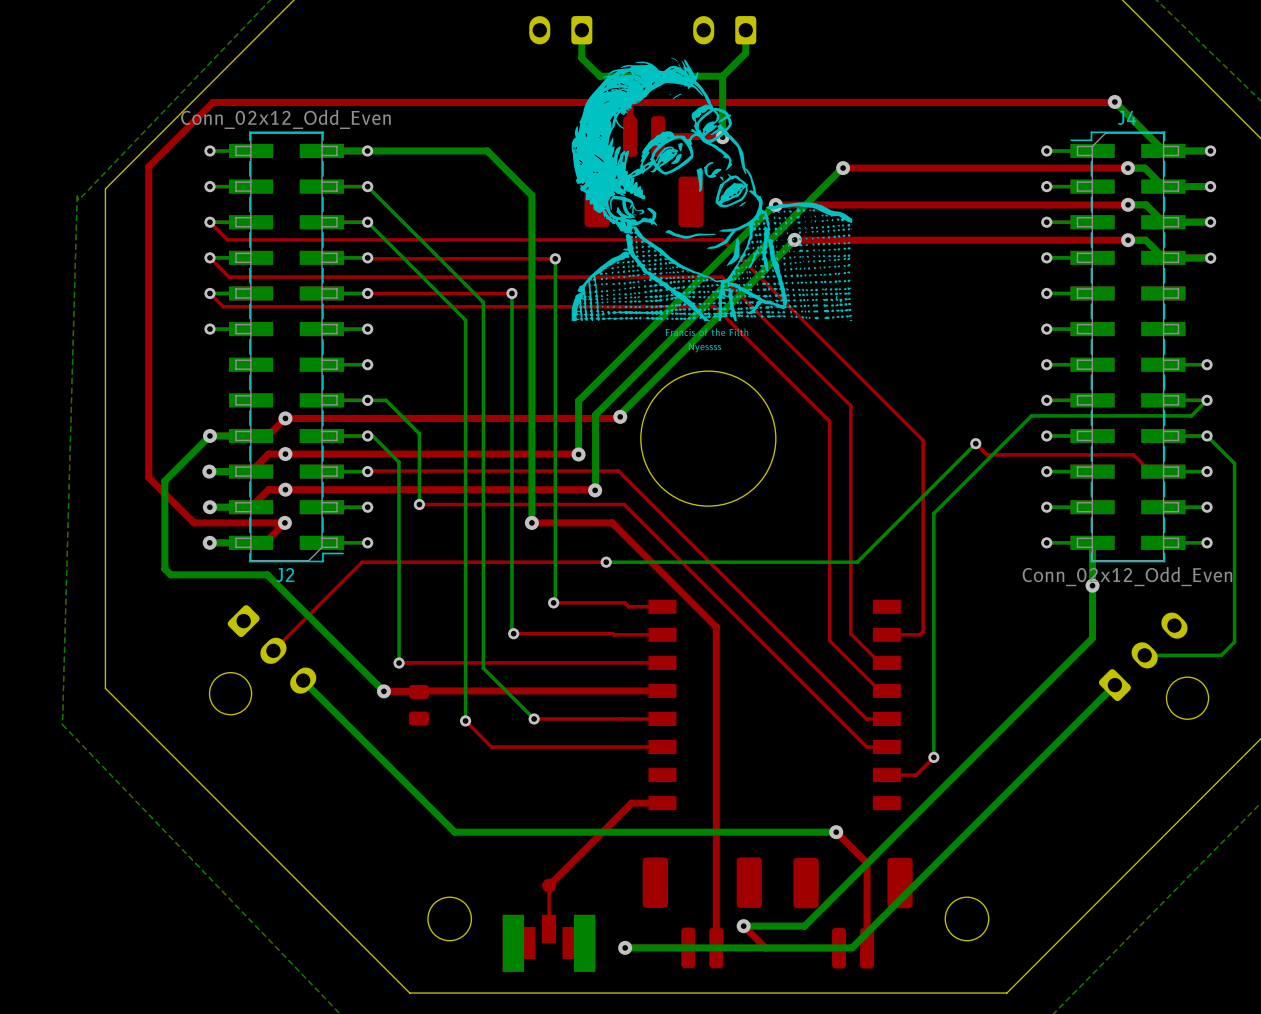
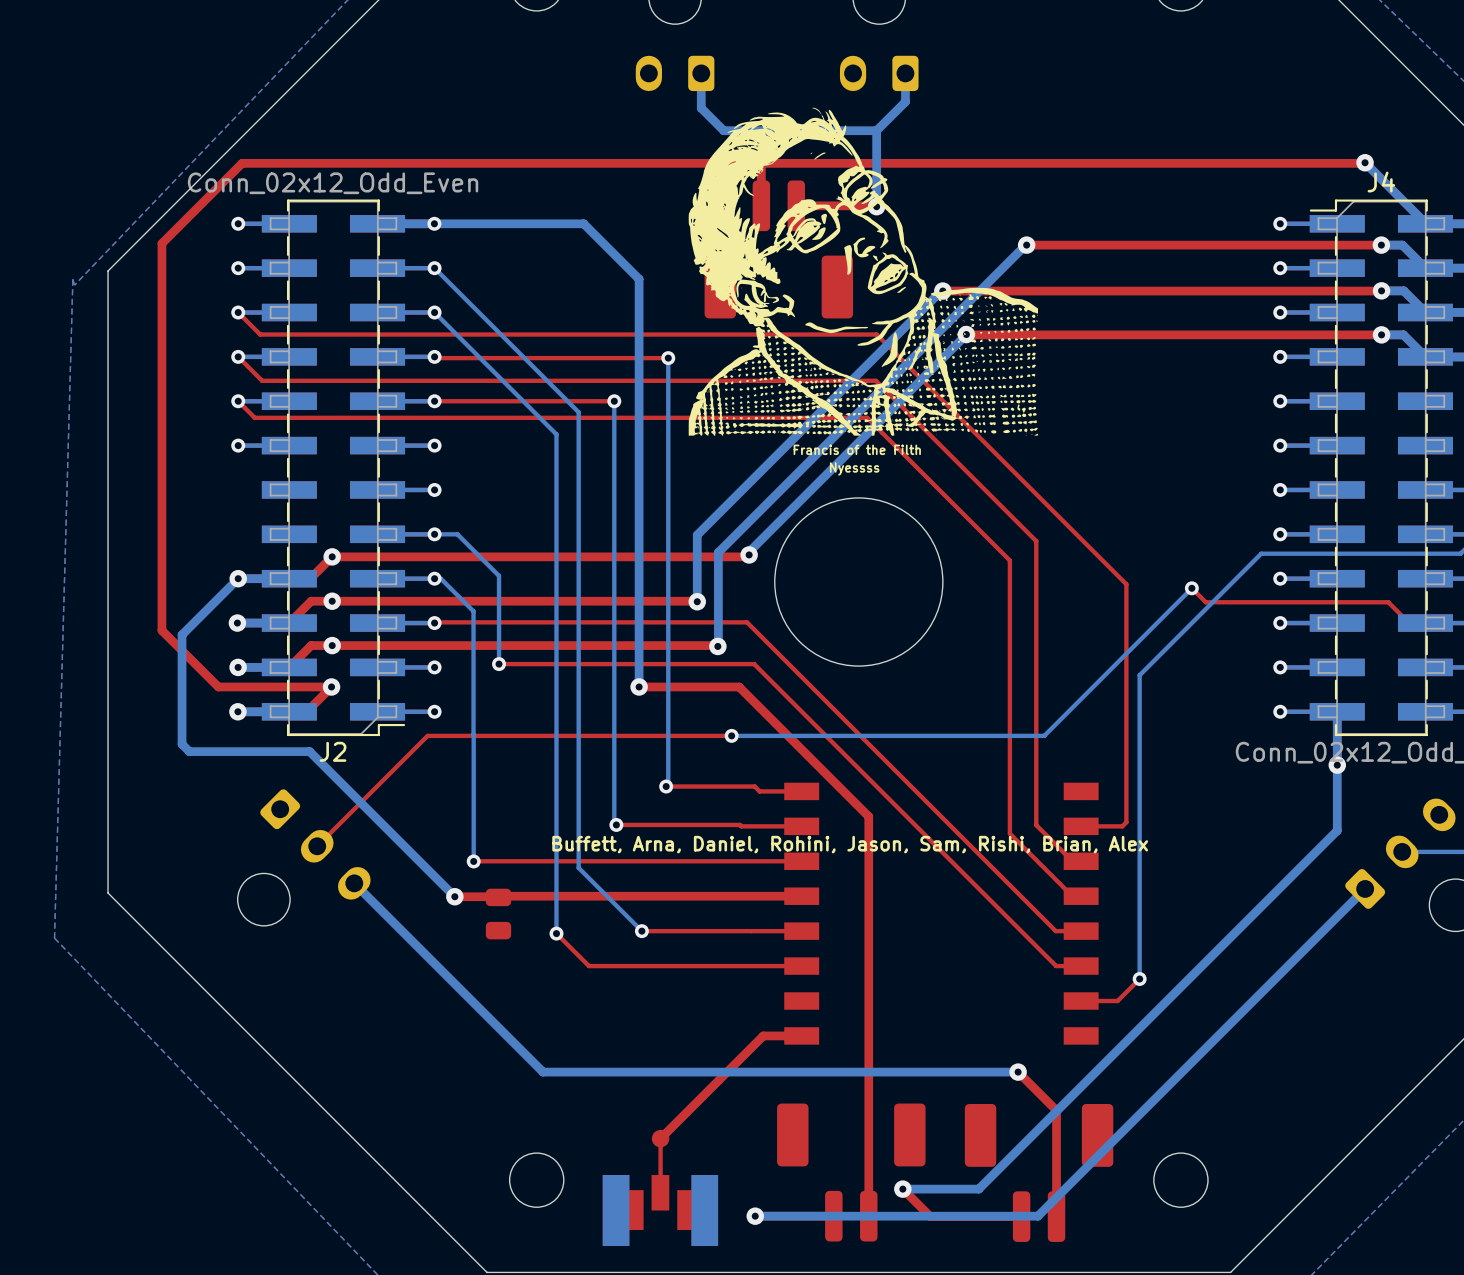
text: none -> Buffett, Arna, Daniel, Rohini, Jason, Sam, Rishi, Brian, Alex (850, 844)

